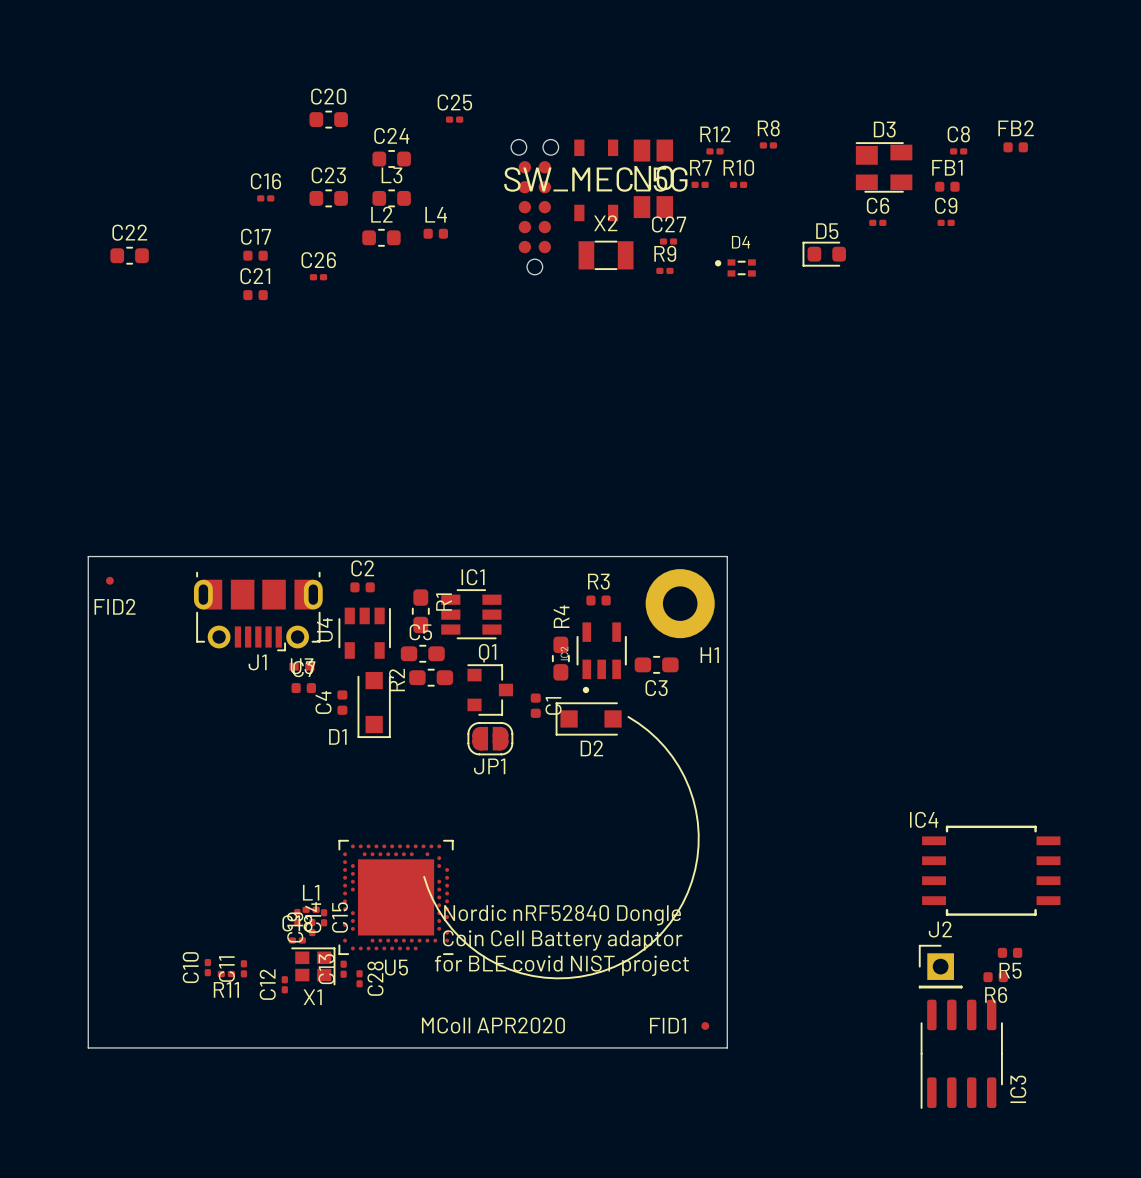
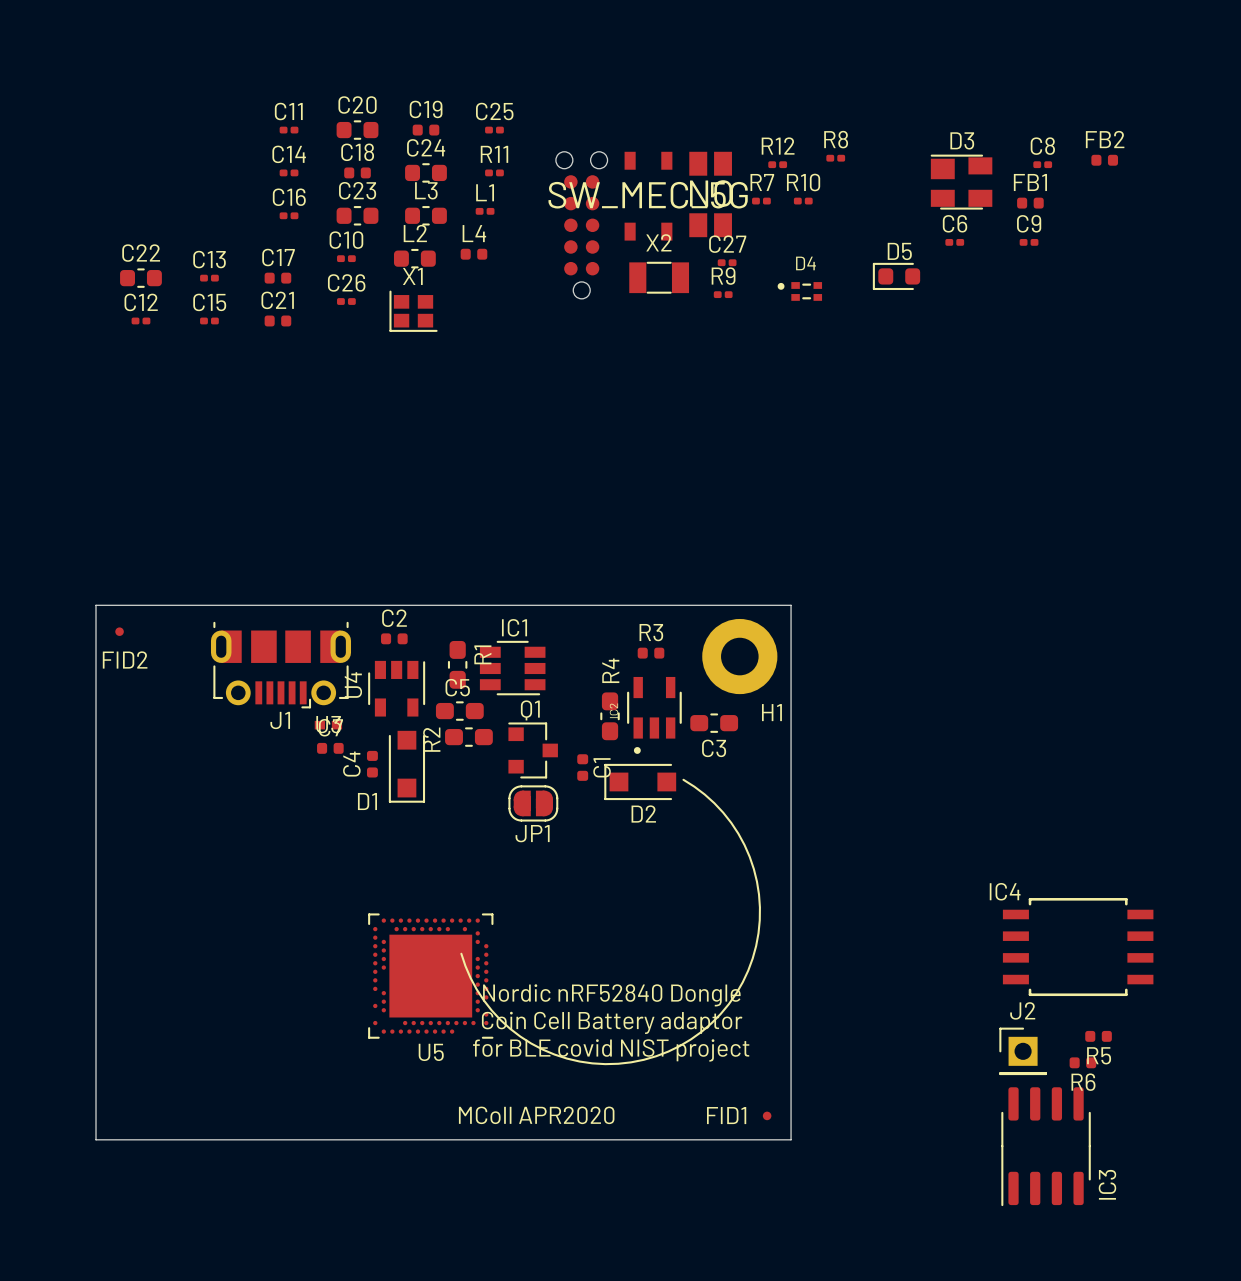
L1 position: (311, 909) -> (485, 211)
C14 rotation: 0° (297, 917) -> 90° clockwise (289, 172)
C14 position: (297, 917) -> (289, 172)
C15 rotation: 0° (324, 917) -> 90° clockwise (209, 320)
C15 position: (324, 917) -> (209, 320)
C19 footprint: [309, 918, 316, 937] -> [412, 124, 440, 136]
C18 footprint: [288, 937, 306, 944] -> [344, 167, 371, 179]
X1 rotation: 0° (313, 966) -> 180° (413, 311)
X1 position: (313, 966) -> (413, 311)
C10 rotation: 0° (207, 967) -> 90° clockwise (346, 258)
C10 position: (207, 967) -> (346, 258)
C11 rotation: 0° (243, 968) -> 90° clockwise (289, 130)
C11 position: (243, 968) -> (289, 130)
C13 rotation: 0° (343, 969) -> 90° clockwise (209, 278)
C13 position: (343, 969) -> (209, 278)
R11 position: (226, 974) -> (494, 172)
C28: (359, 978) -> none
C12 rotation: 0° (284, 984) -> 90° clockwise (140, 320)
C12 position: (284, 984) -> (140, 320)
R11 name position: R11 (226, 989) -> R11 (494, 154)

